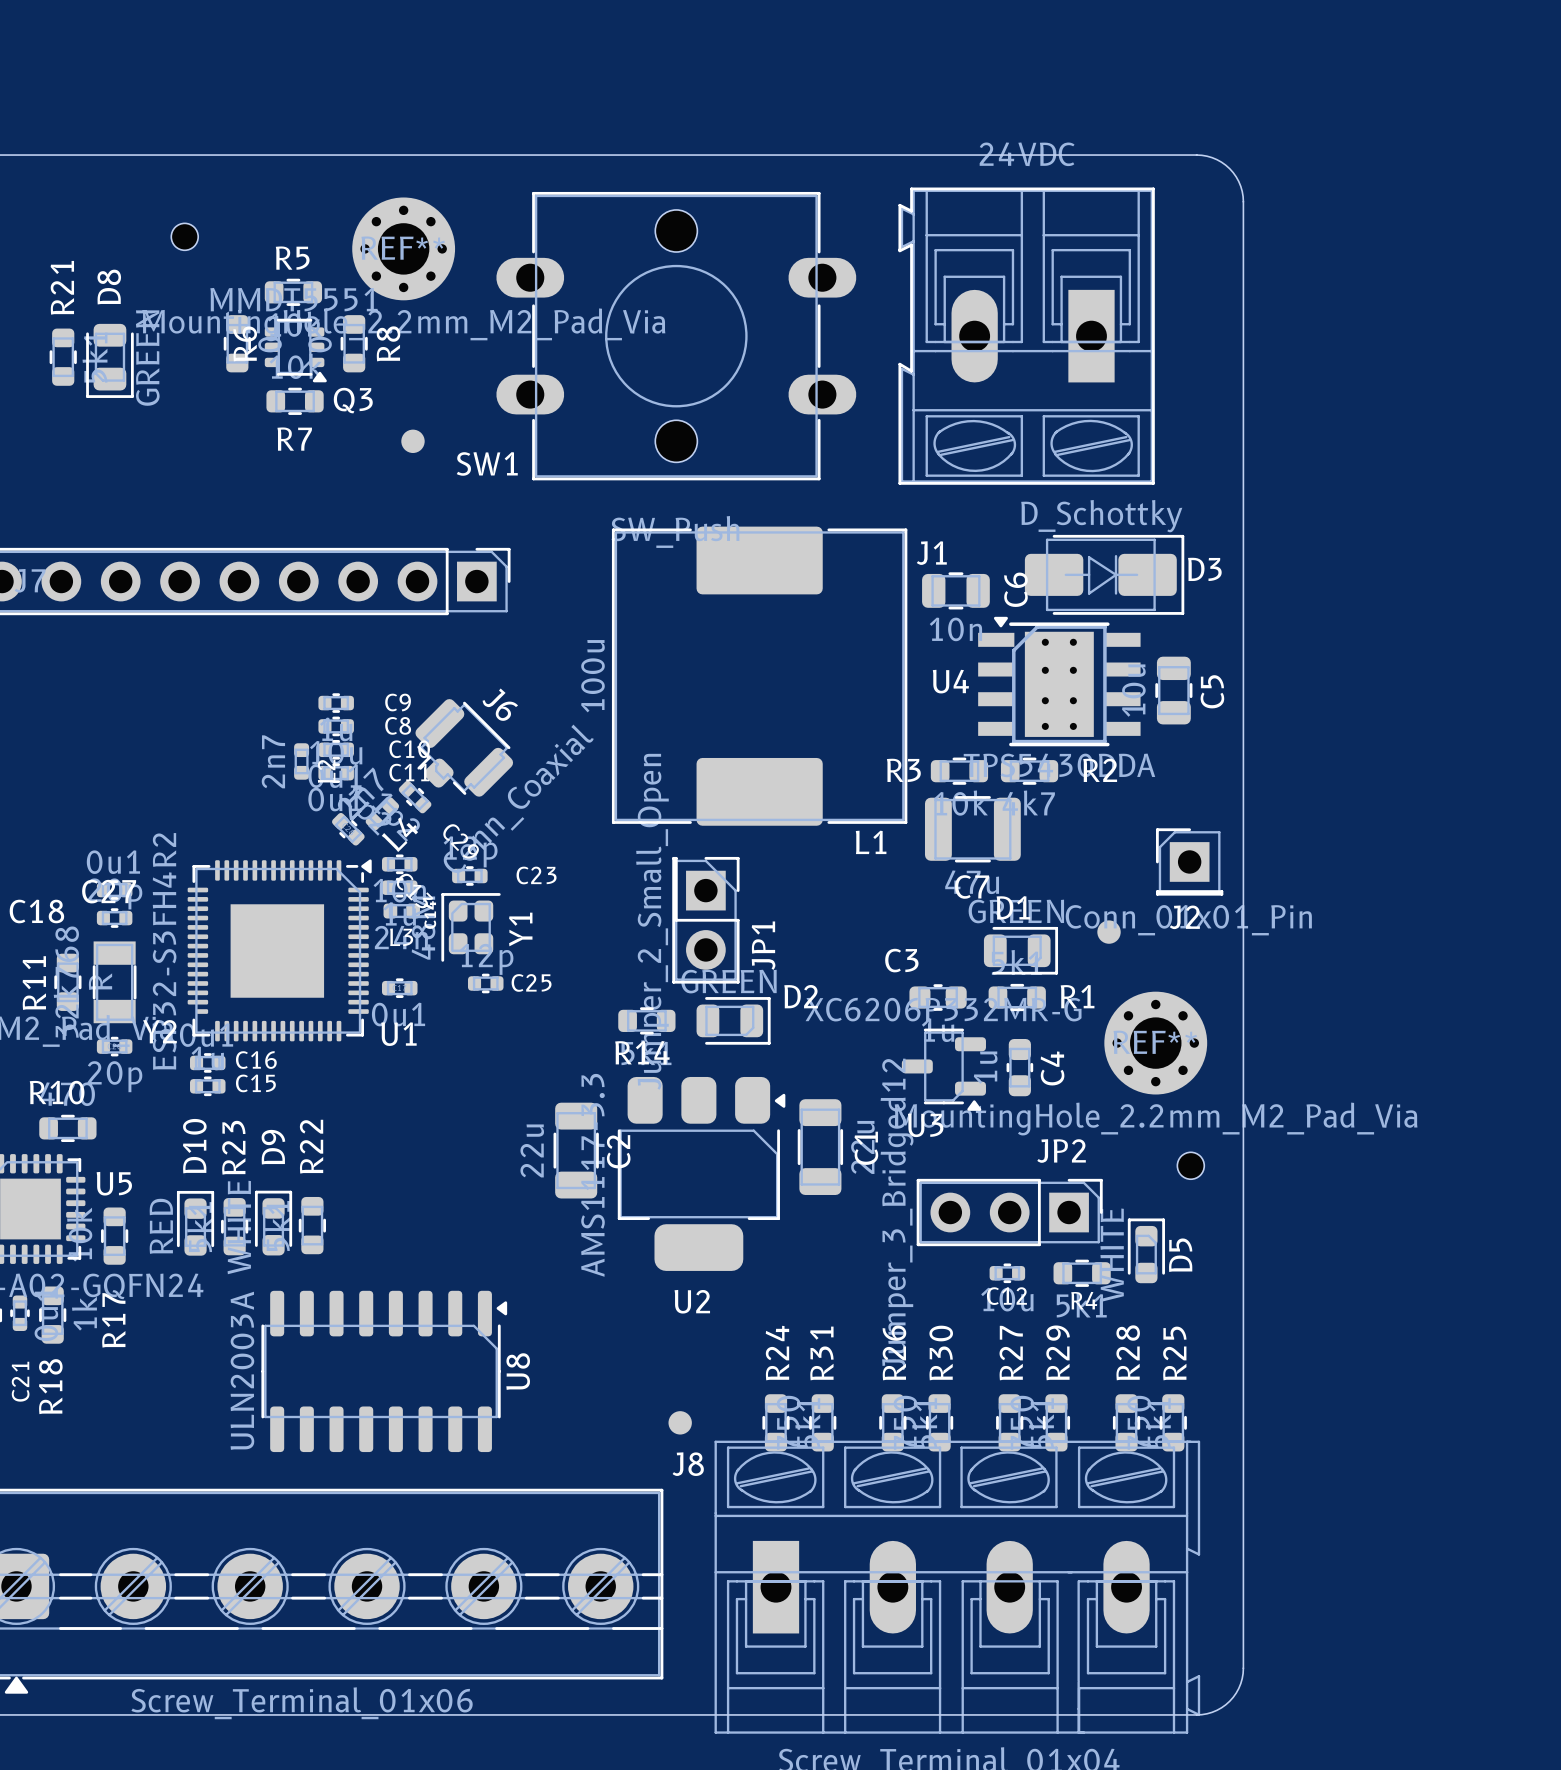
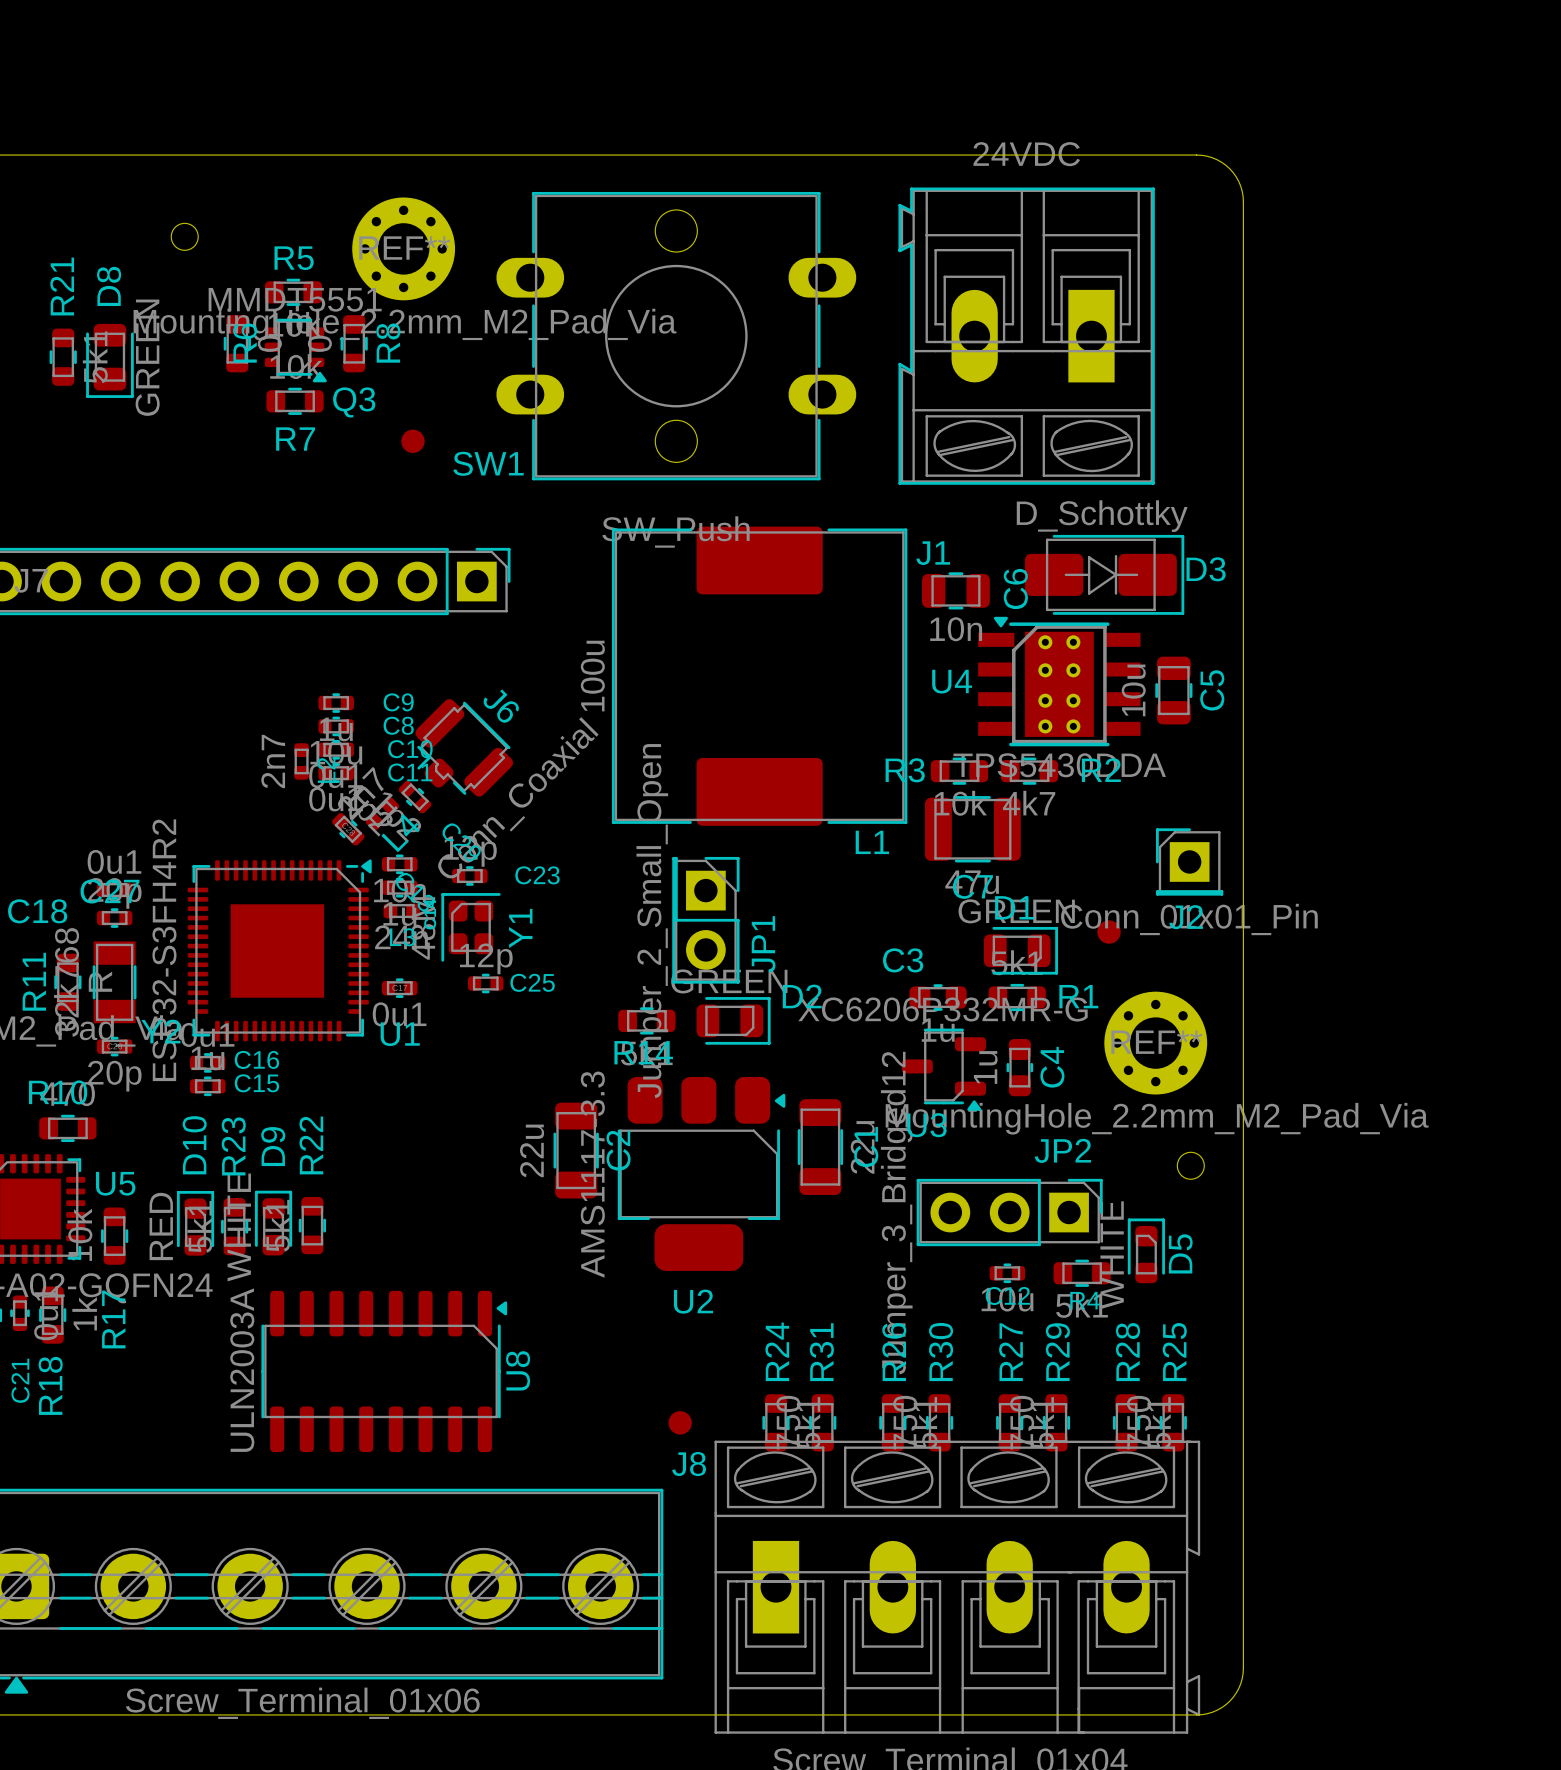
U1 footprint: [187, 859, 372, 1042] -> [187, 859, 372, 1042]

